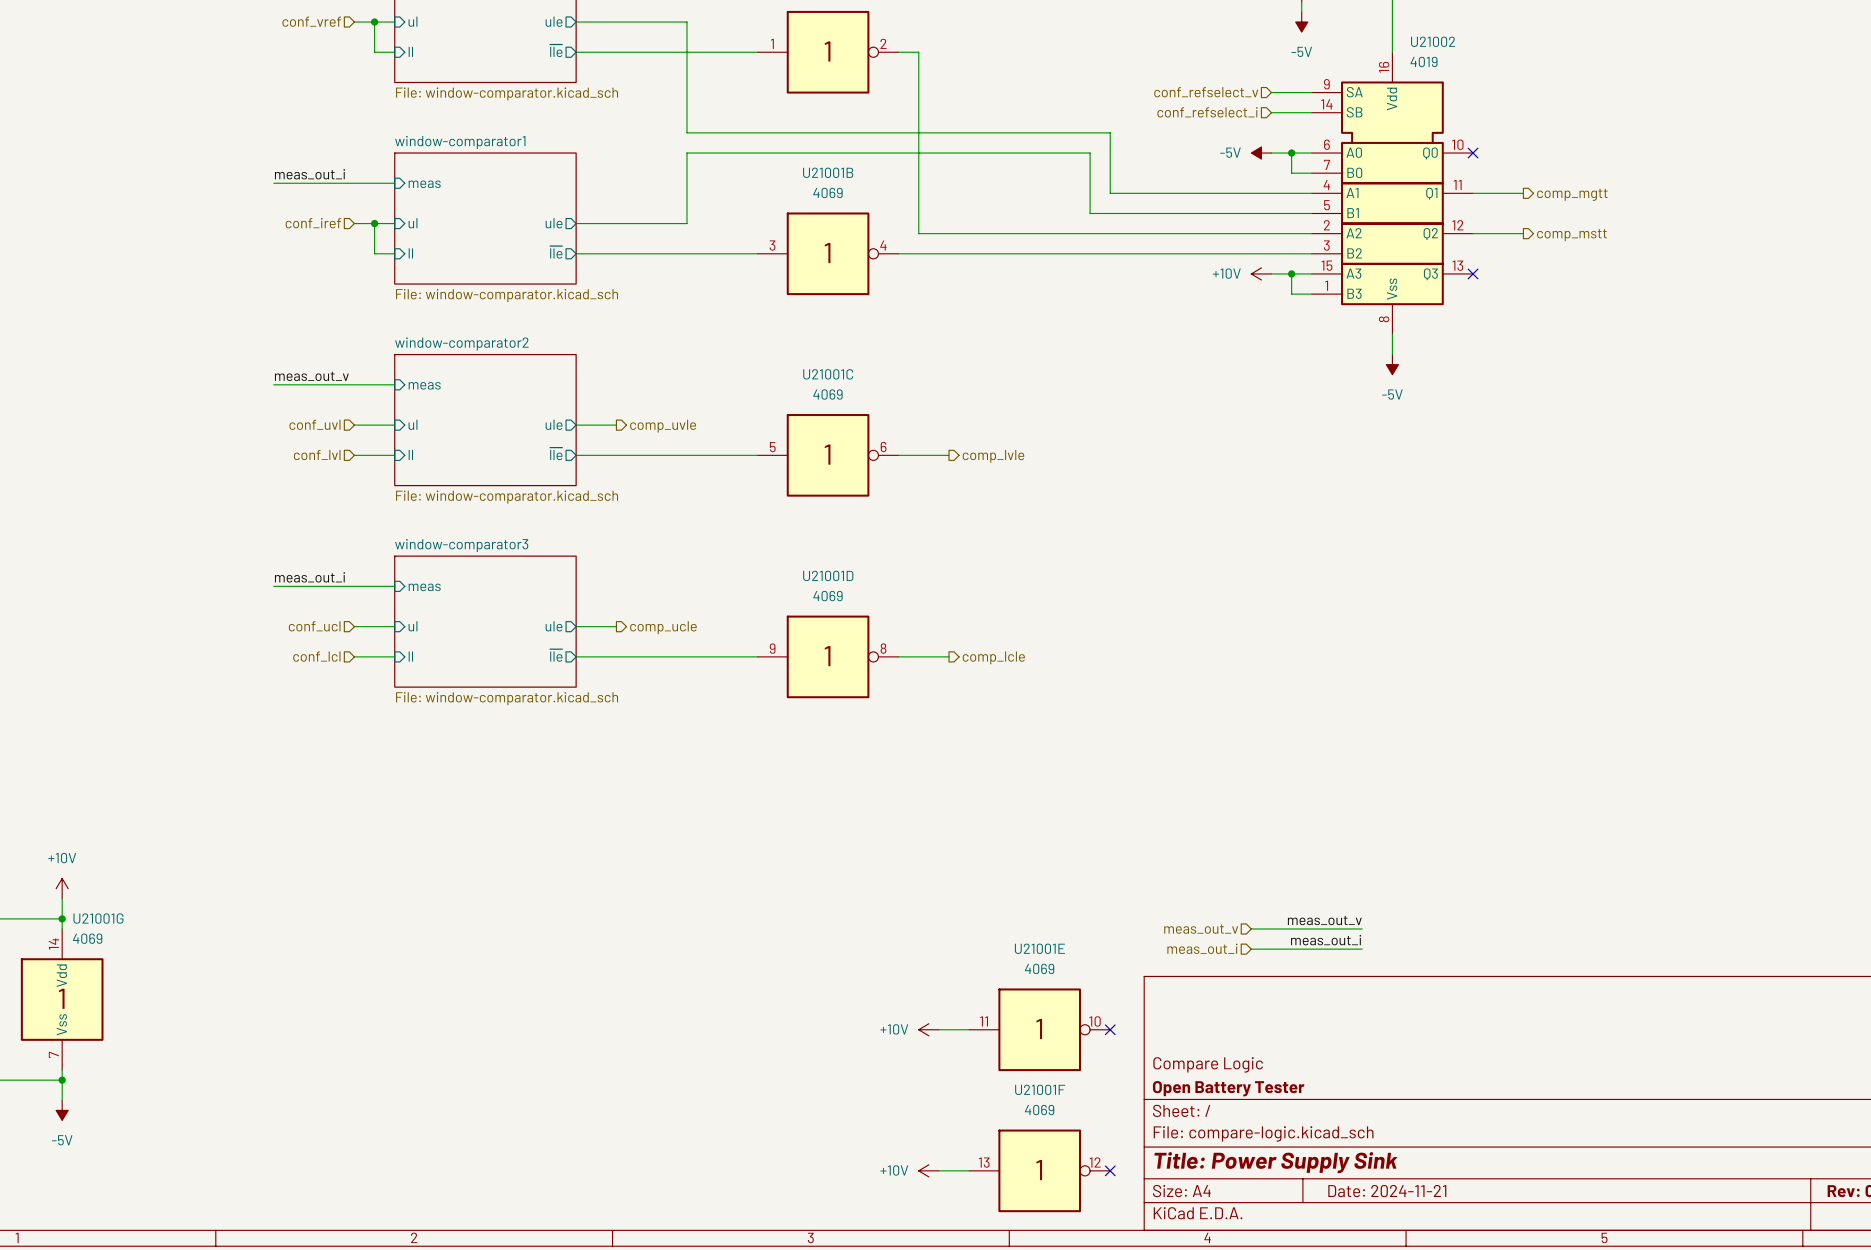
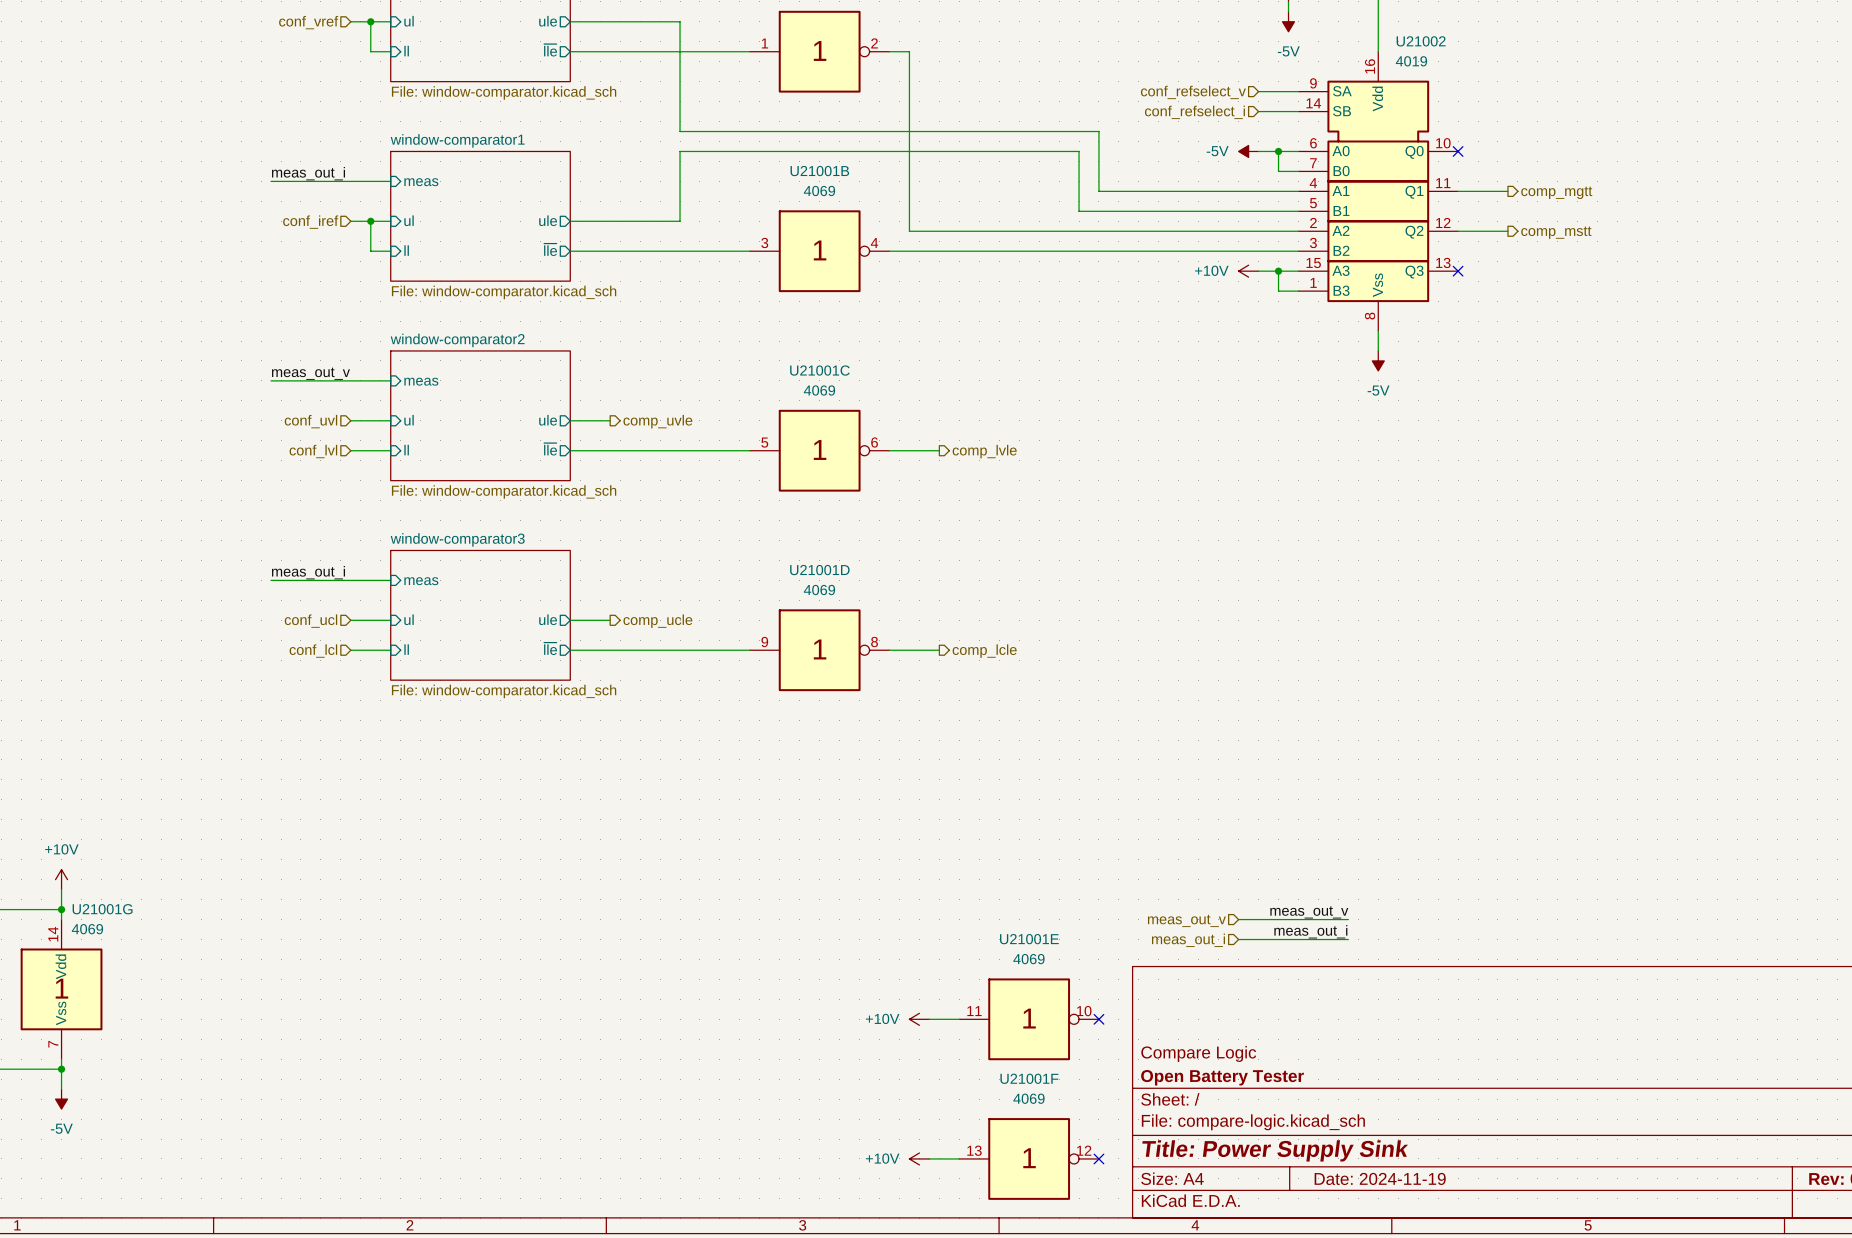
title block: Date: 2024-11-21 (1387, 1191) -> Date: 2024-11-19 (1380, 1178)

